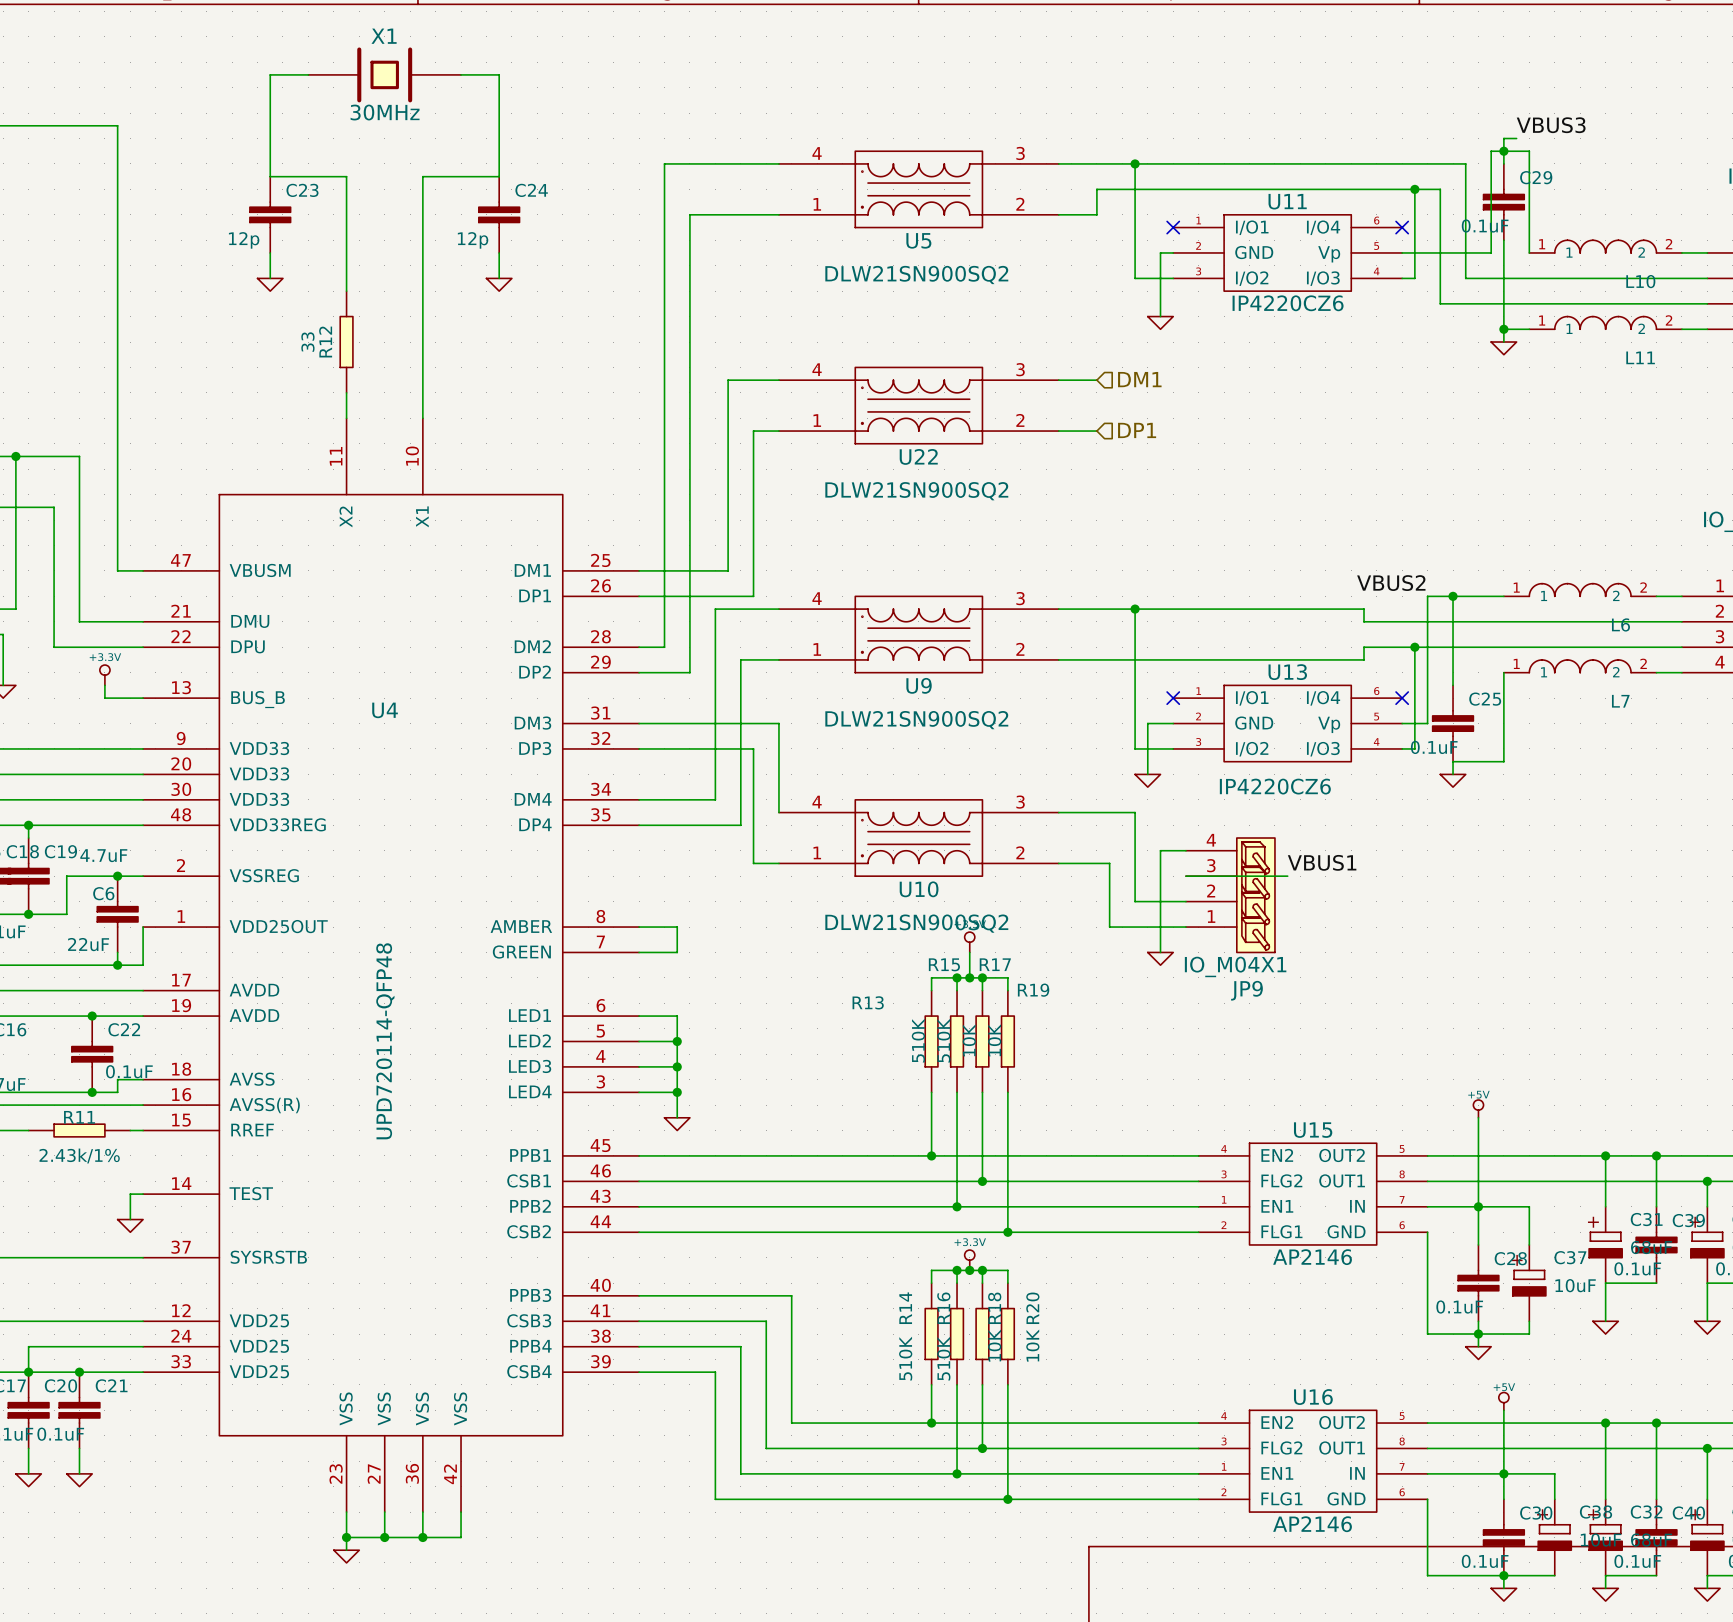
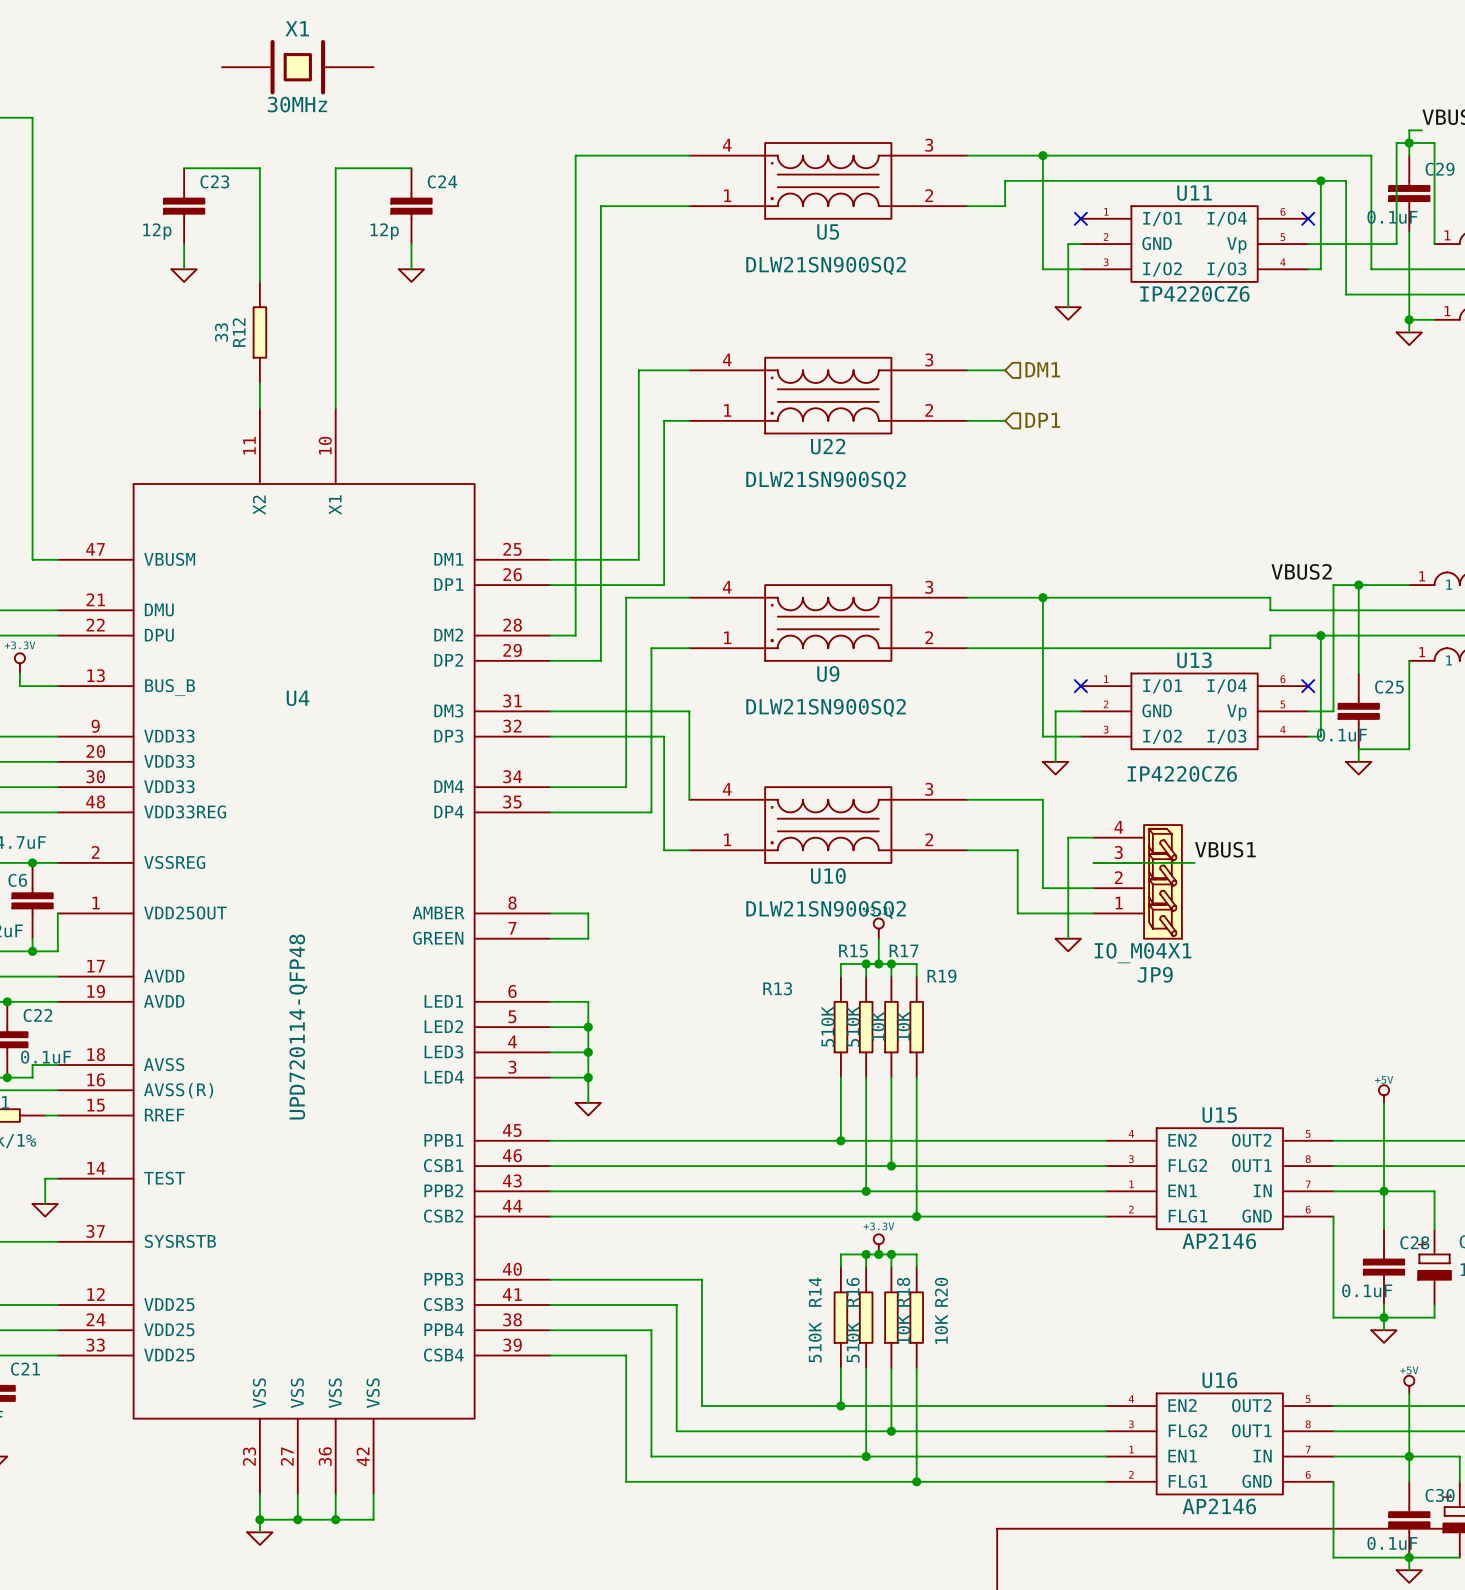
wire: (308, 74) (270, 74) (270, 176) -> none
wire: (461, 74) (499, 74) (499, 176) -> none

